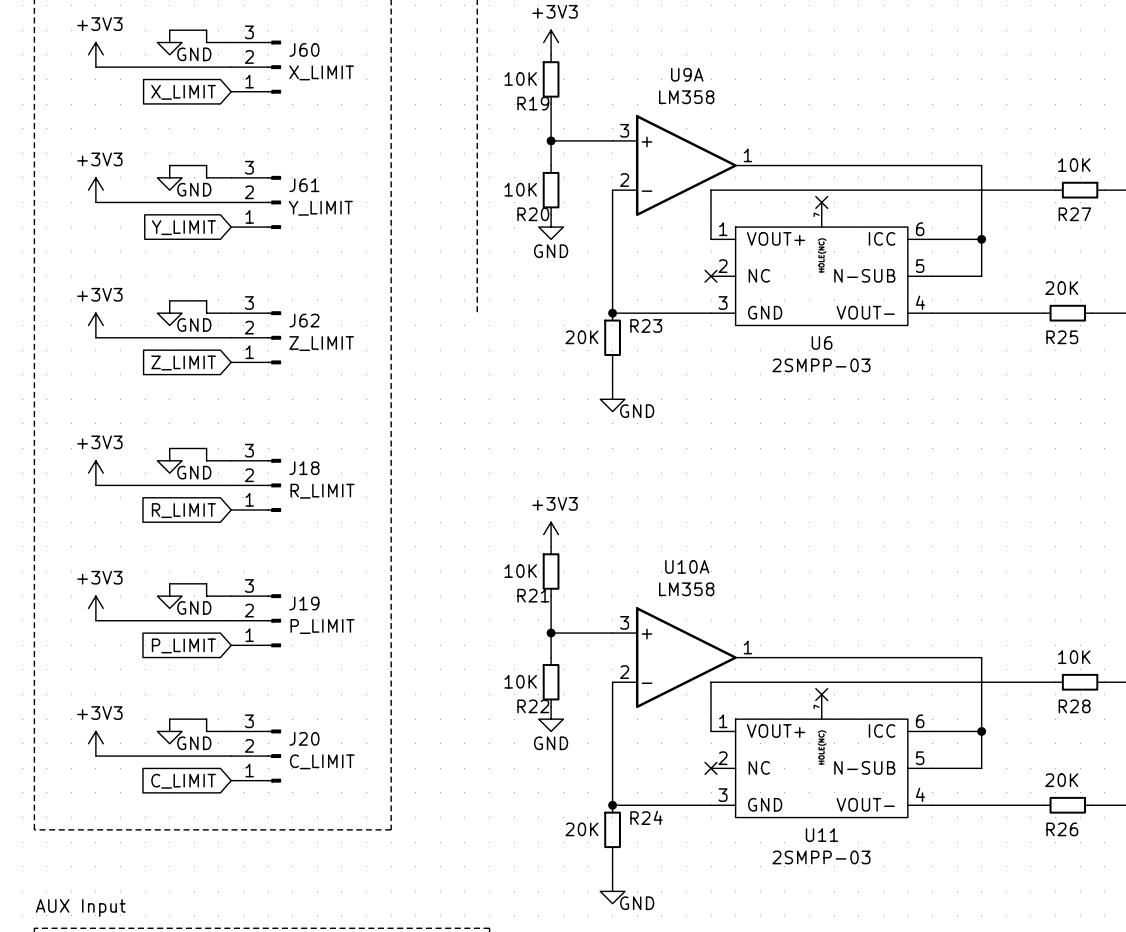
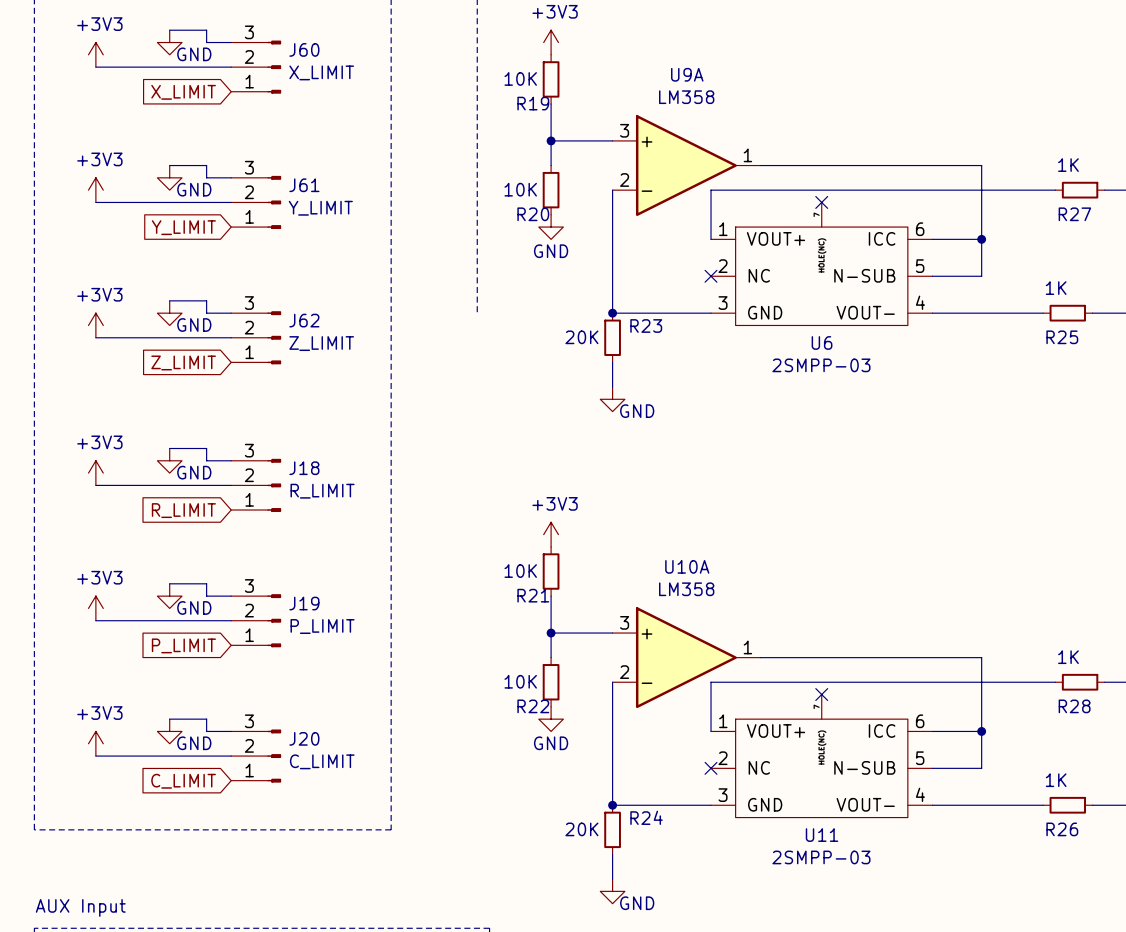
R27 value: 10K (1074, 165) -> 1K (1068, 165)
R25 value: 20K (1061, 288) -> 1K (1056, 288)
R28 value: 10K (1074, 657) -> 1K (1068, 657)
R26 value: 20K (1061, 780) -> 1K (1056, 780)

